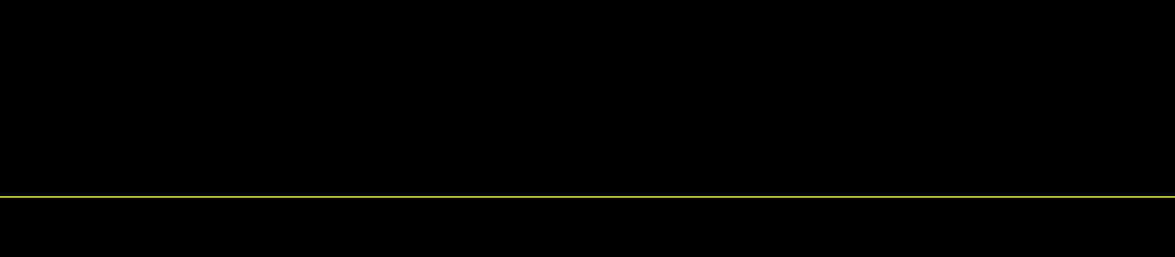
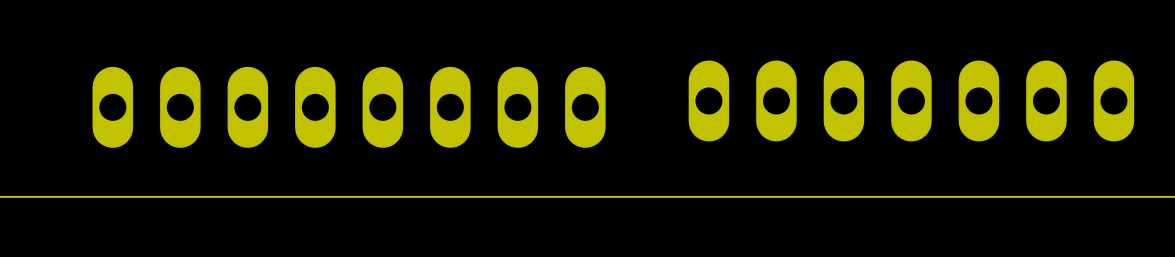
part: none -> (911, 100)
part: none -> (349, 107)

